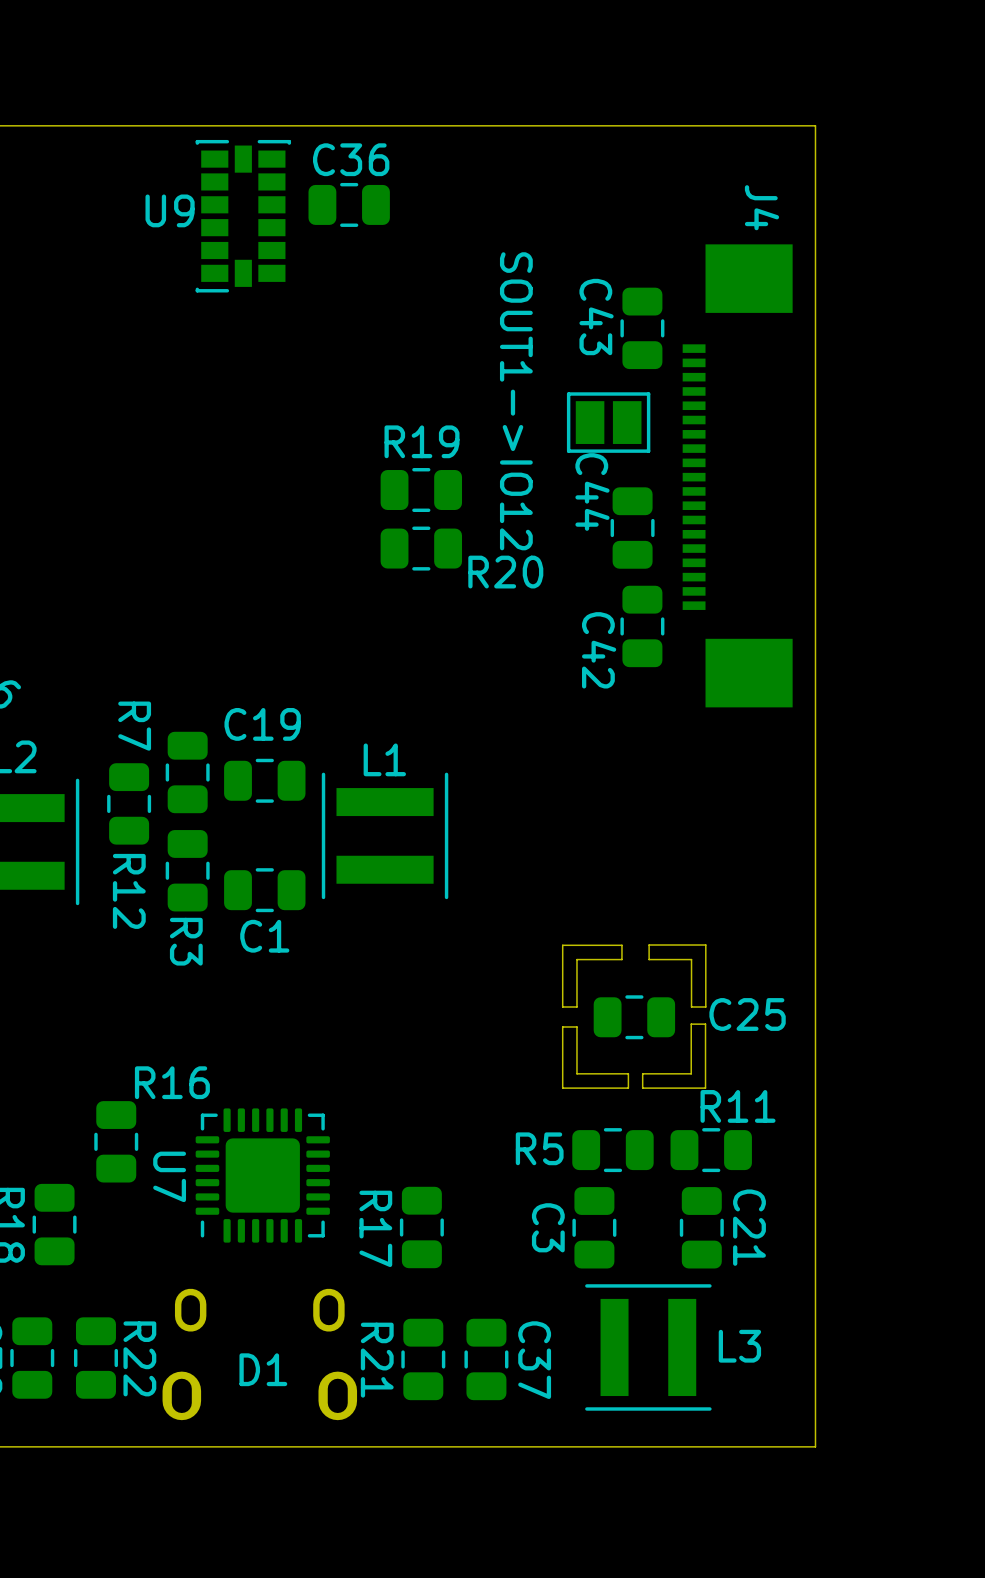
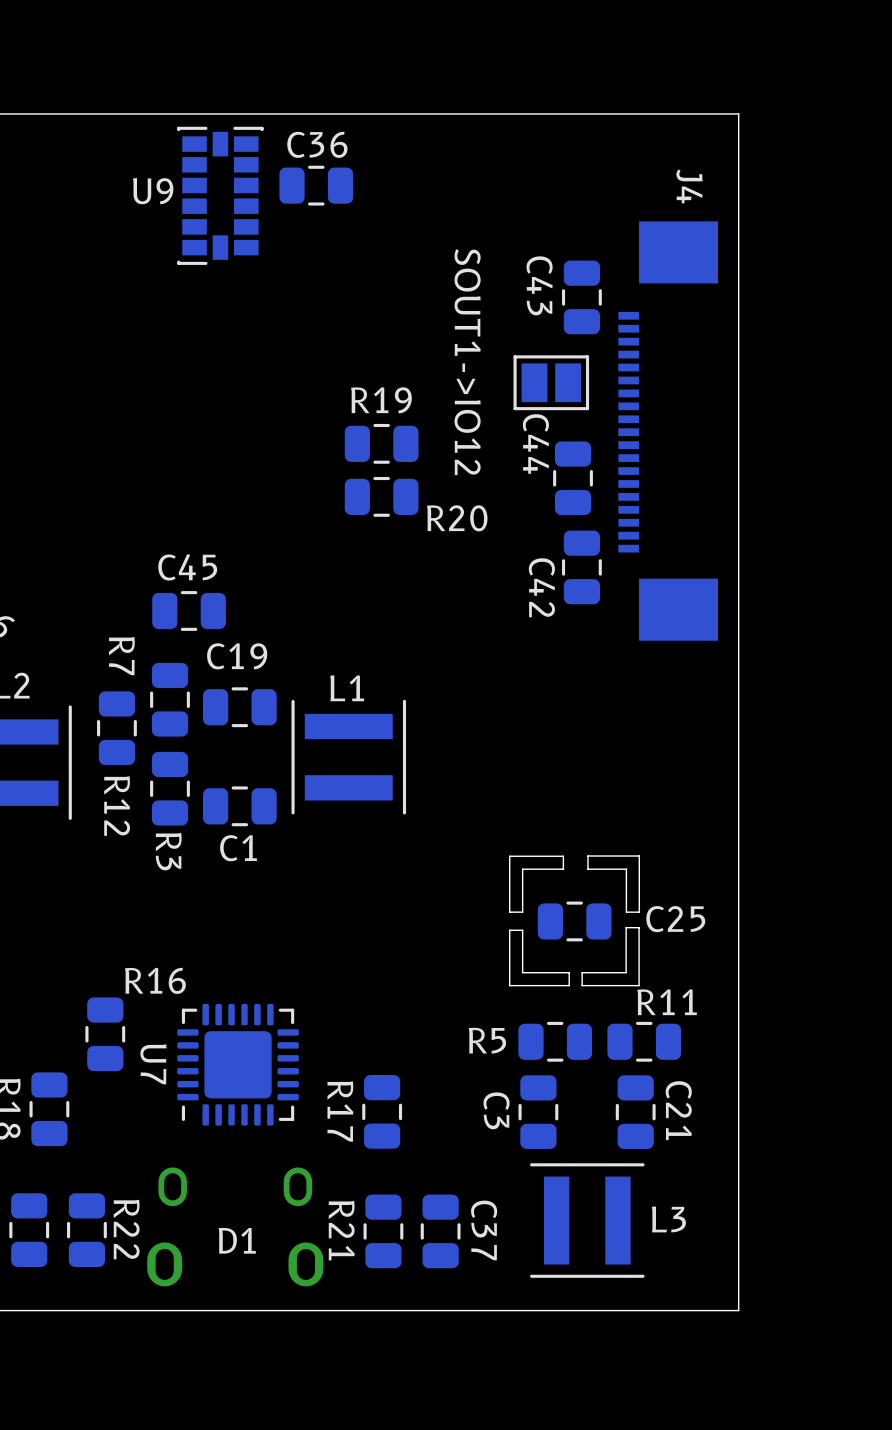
C45: none -> (189, 610)

